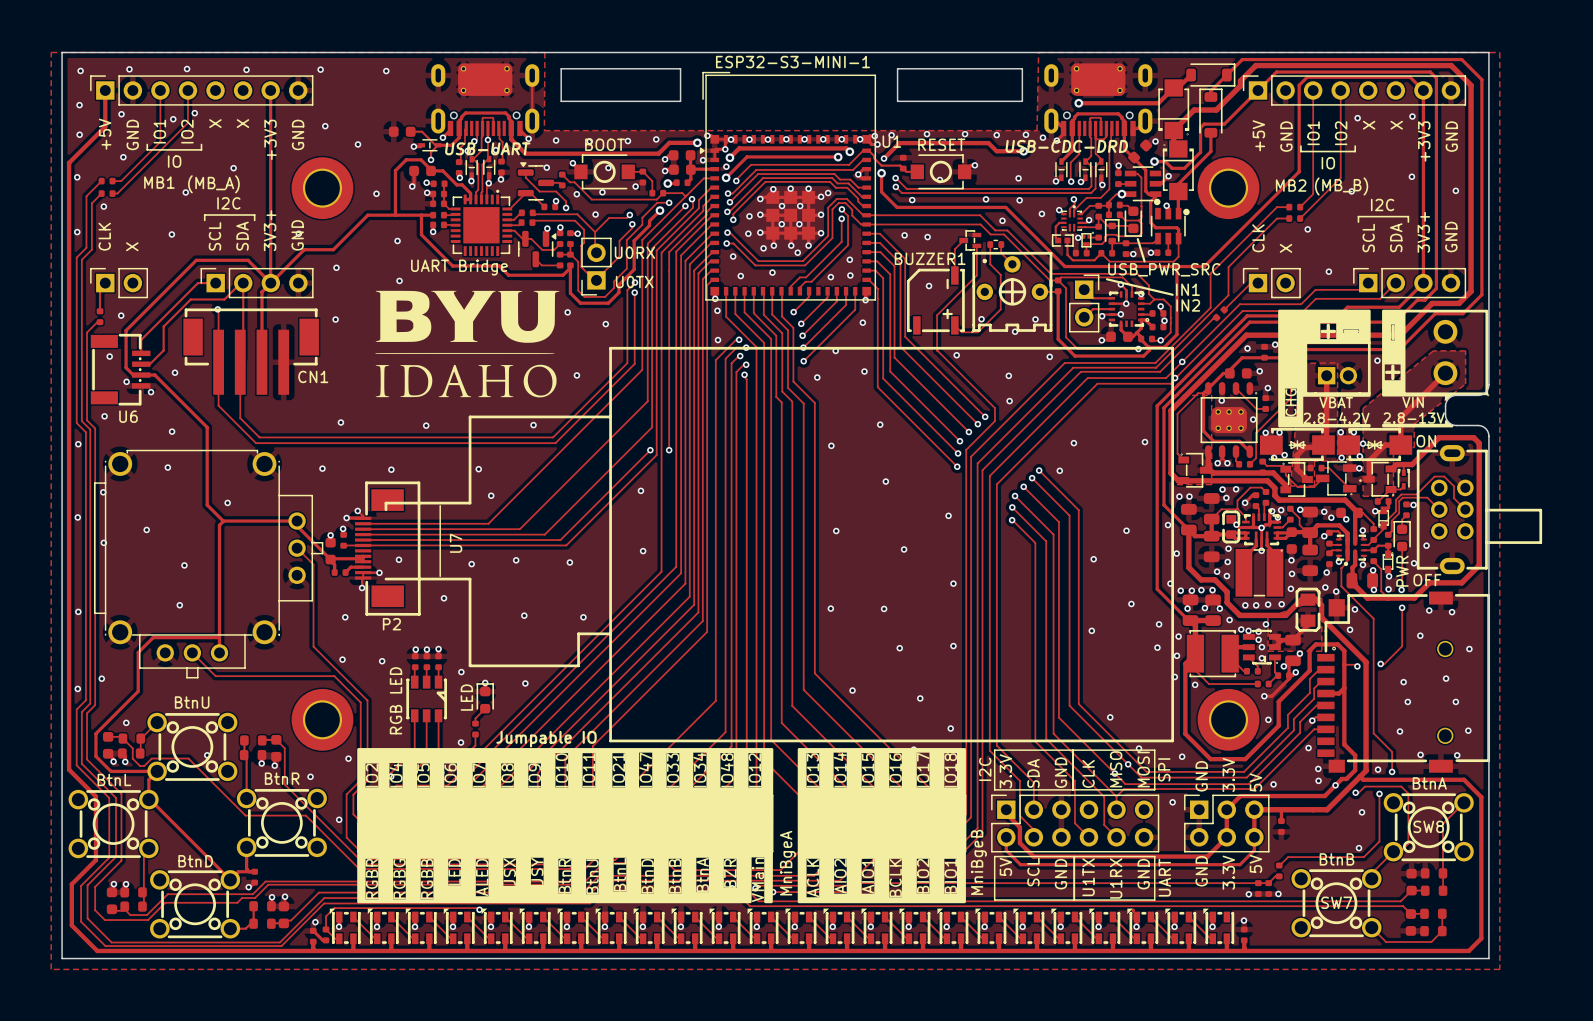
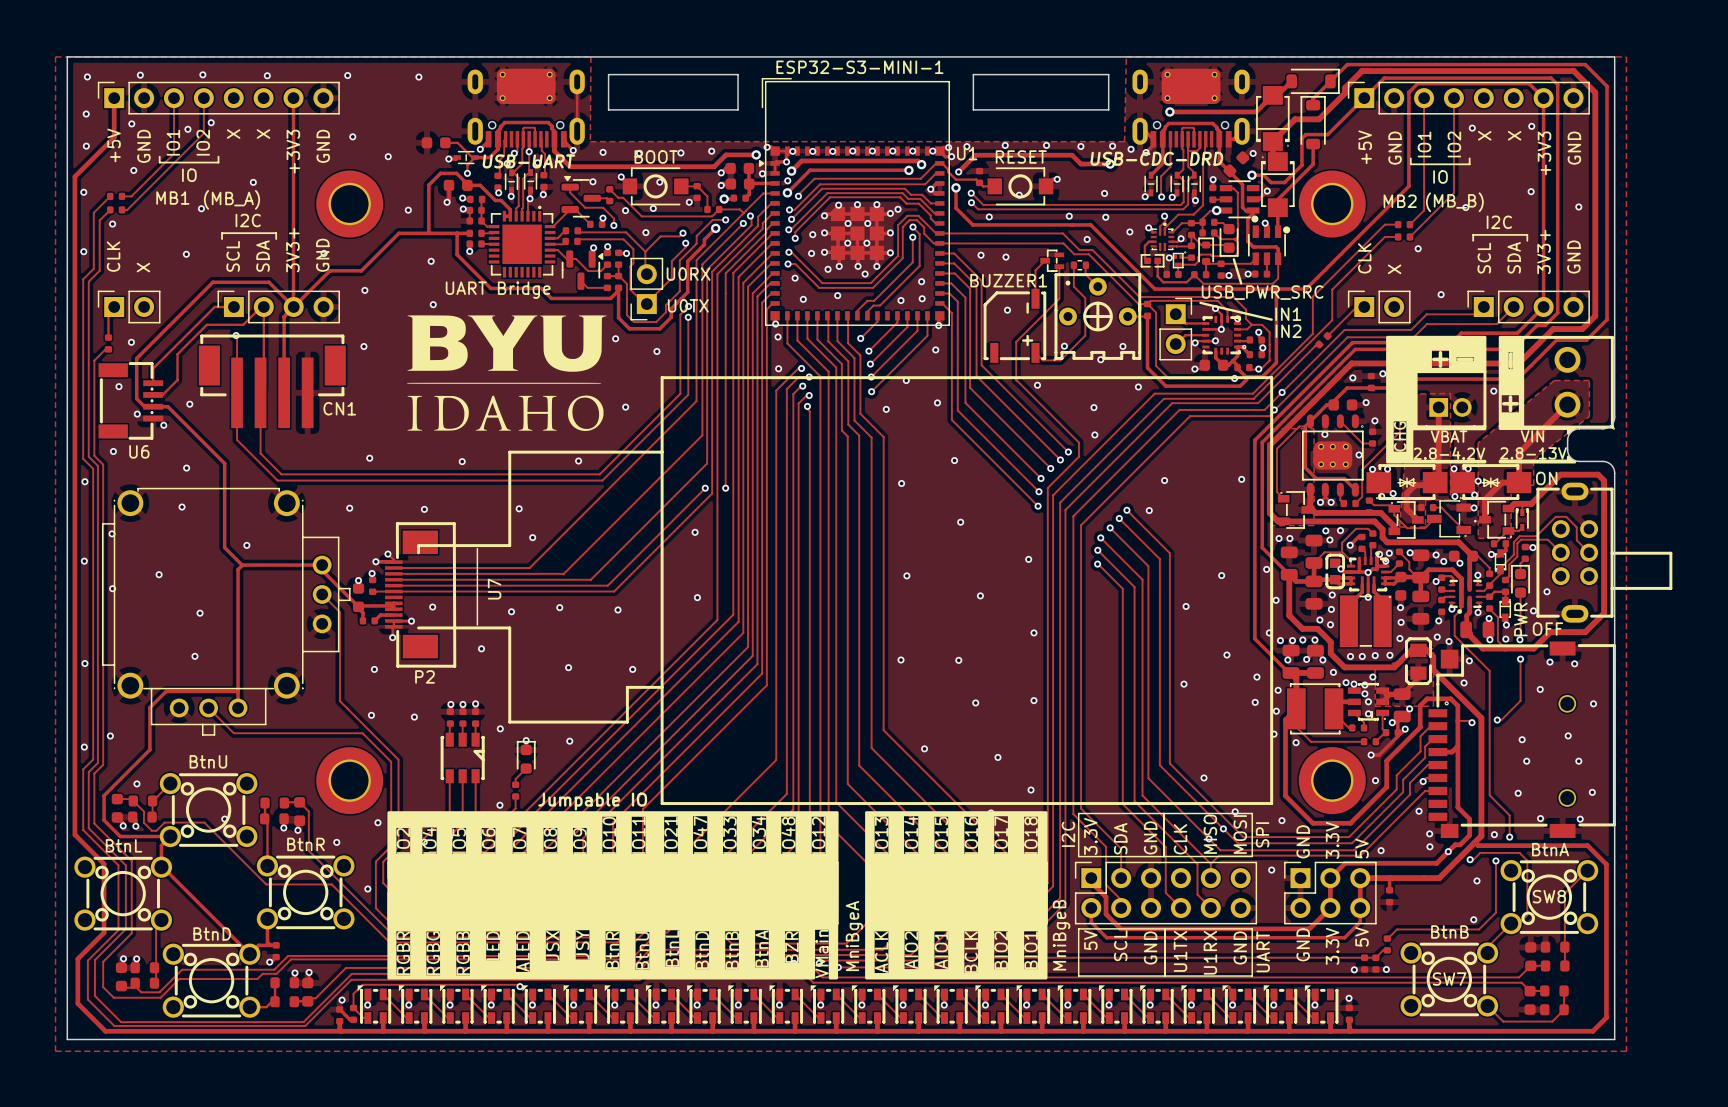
text: LED (466, 697) -> none
text: RGB LED (396, 700) -> none

